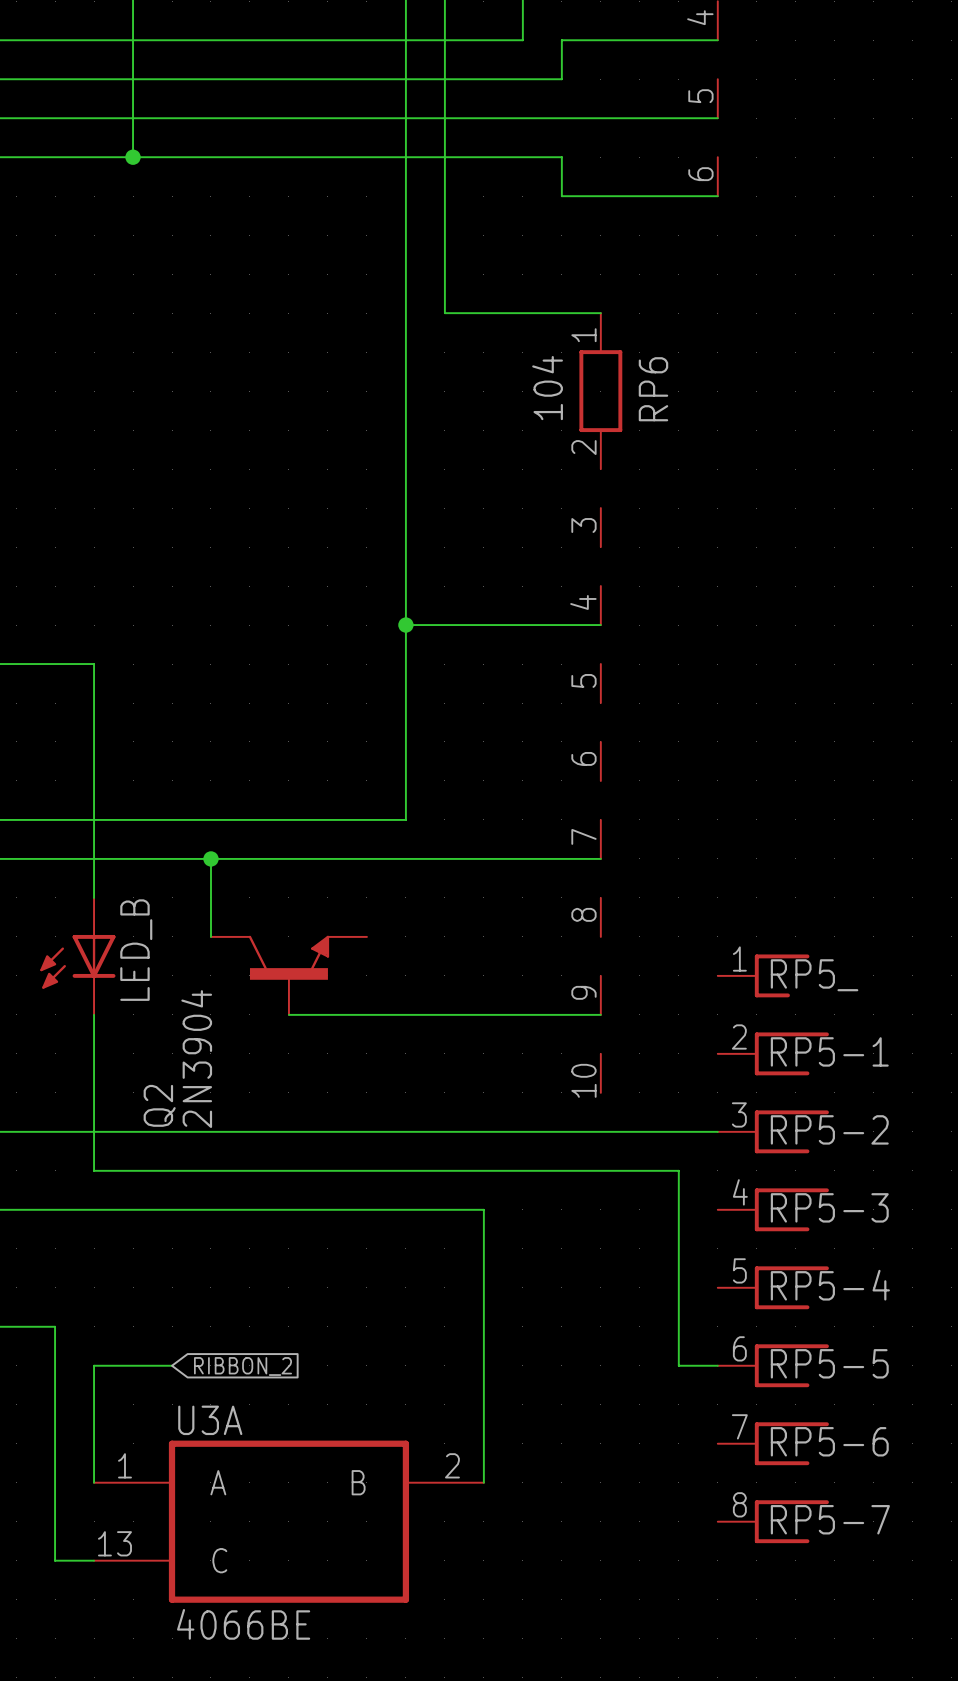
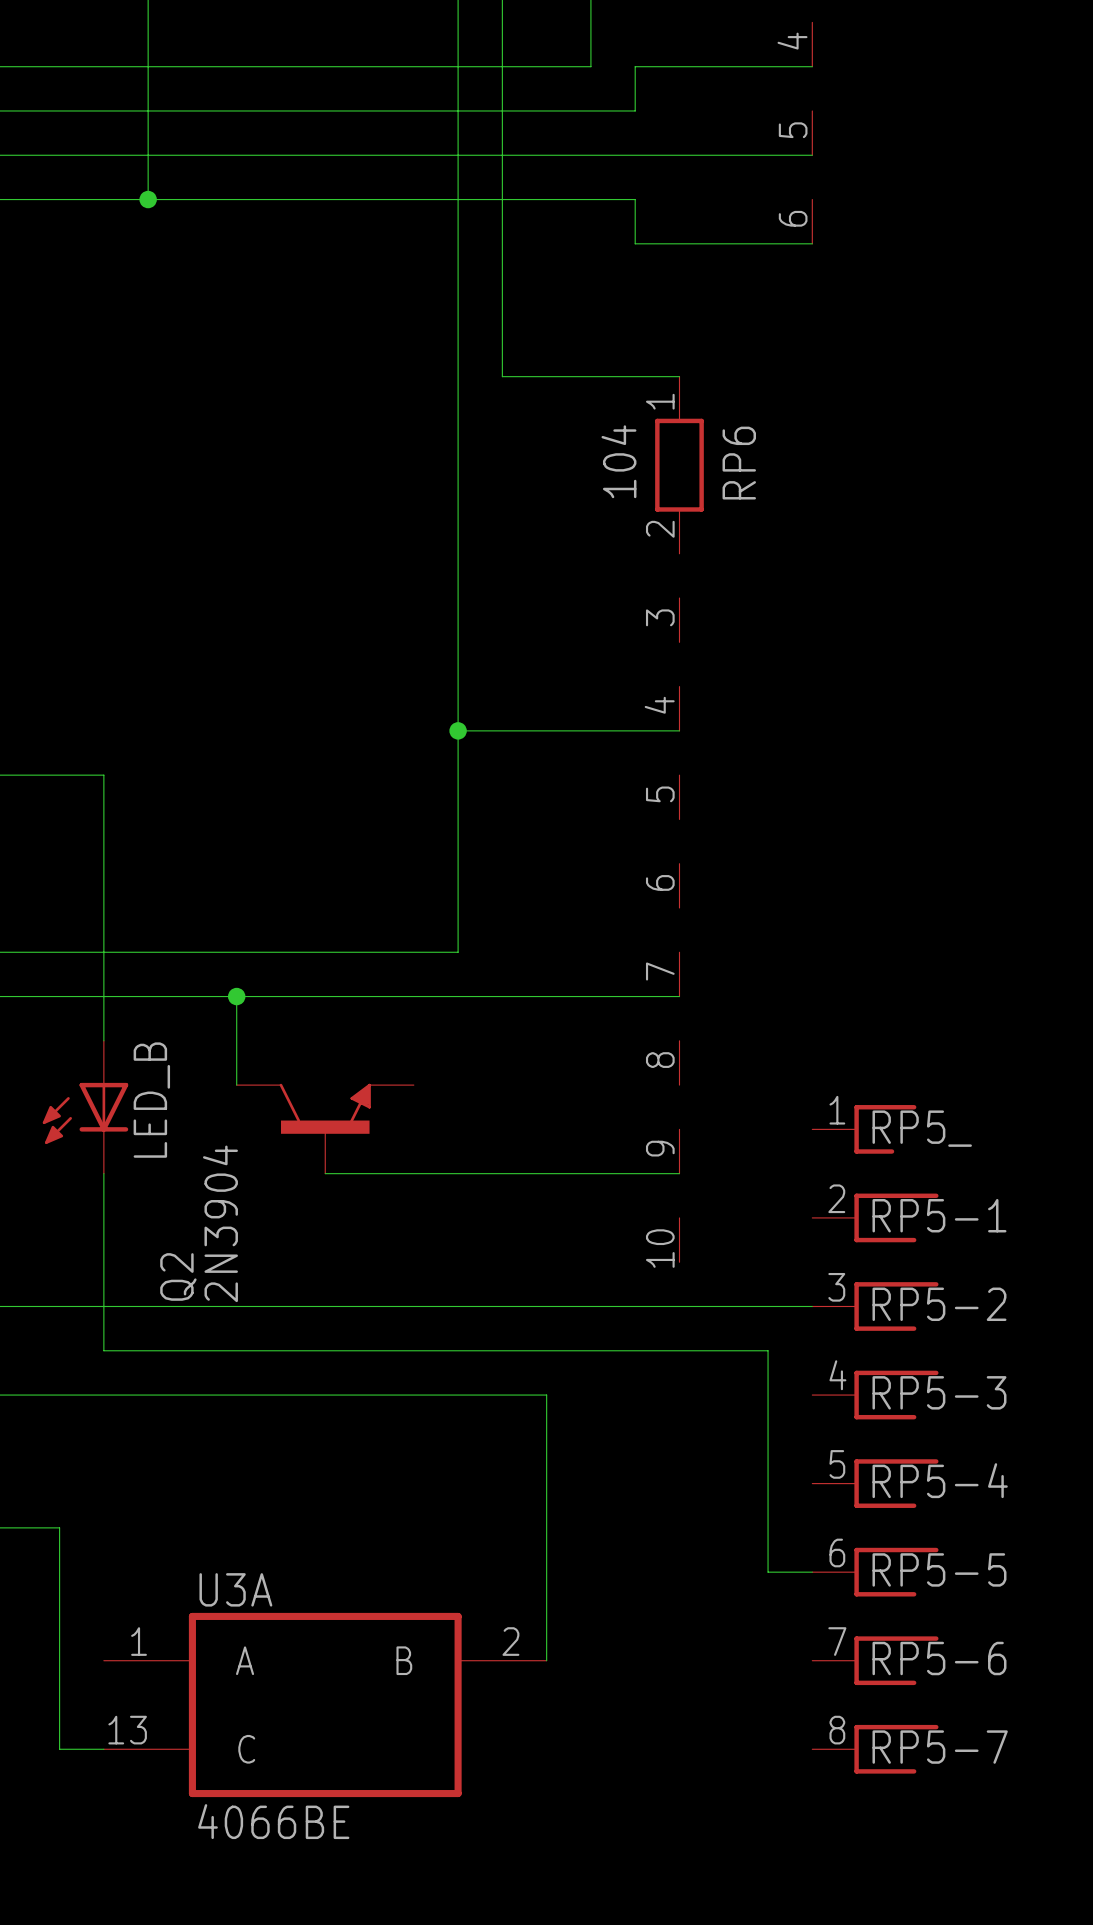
wire: (172, 1365) (94, 1365) (94, 1482) -> none
global label: RIBBON_2 (243, 1366) -> none
wire: (483, 1443) (483, 1482) -> none
wire: (55, 1521) (55, 1560) (94, 1560) -> (59, 1749) (103, 1749)
U3A position: (288, 1521) -> (325, 1704)

